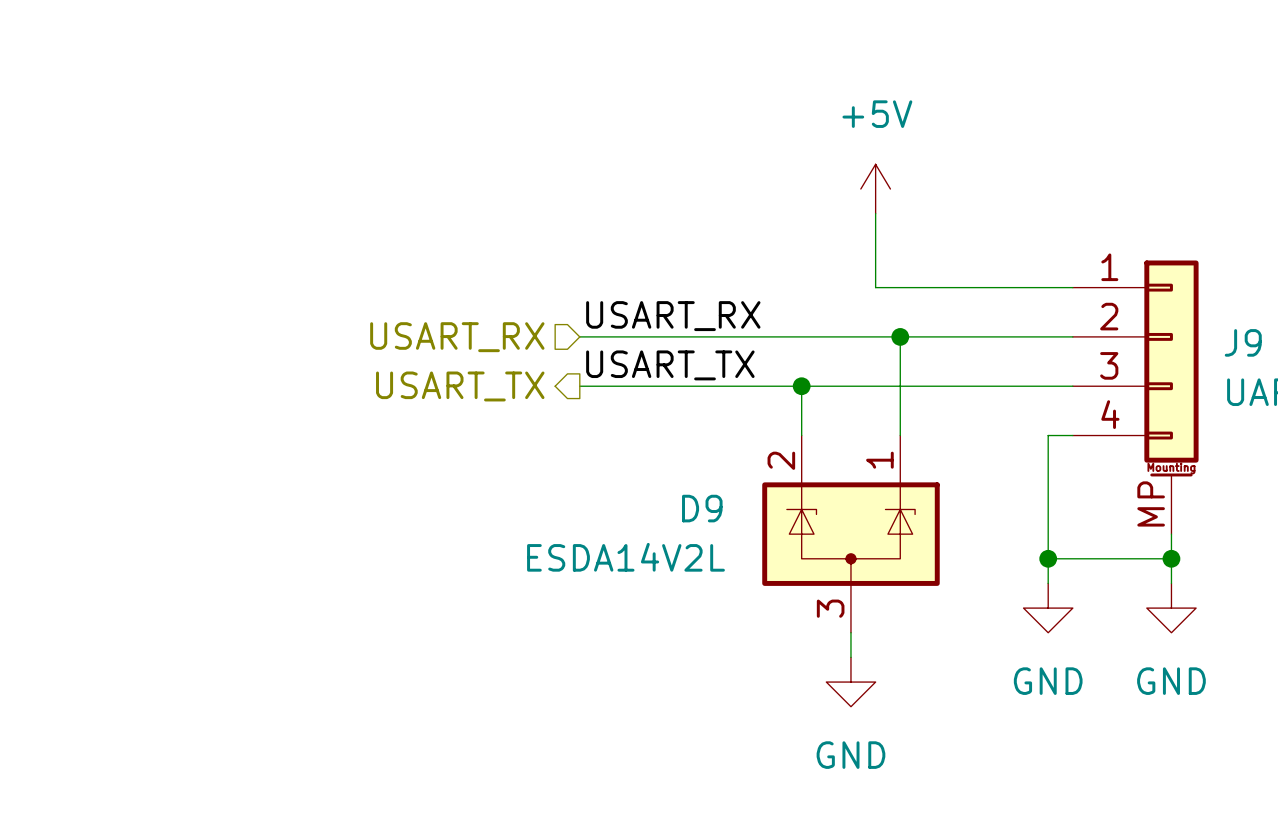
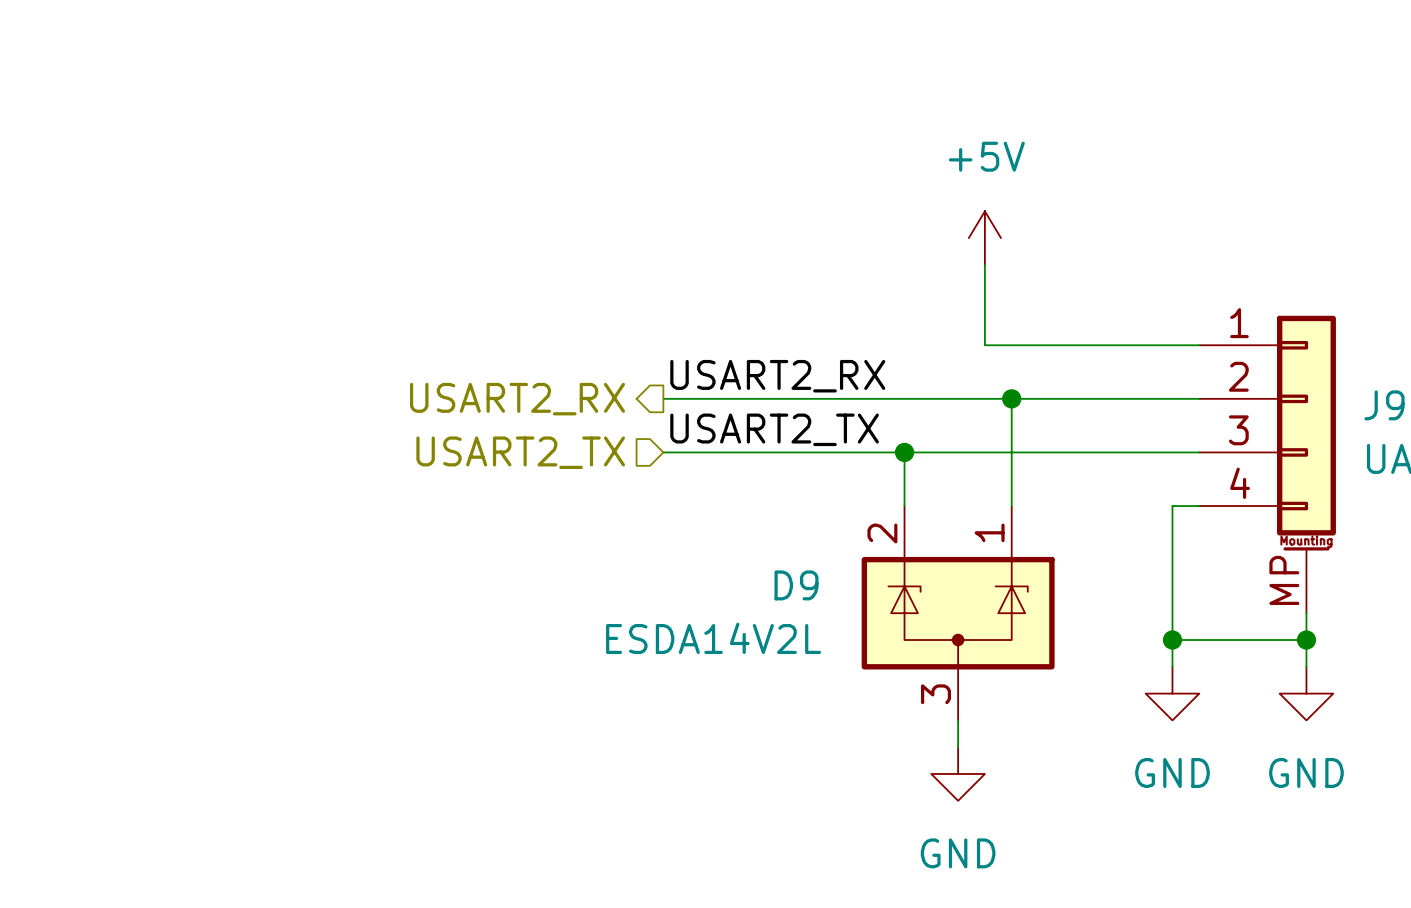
label: USART_RX (673, 316) -> USART2_RX (777, 376)
hierarchical label shape: input (457, 337) -> output (517, 399)
hierarchical label: USART_RX (457, 337) -> USART2_RX (517, 399)
label: USART_TX (670, 365) -> USART2_TX (774, 429)
hierarchical label shape: output (460, 386) -> input (520, 452)
hierarchical label: USART_TX (460, 386) -> USART2_TX (520, 452)

